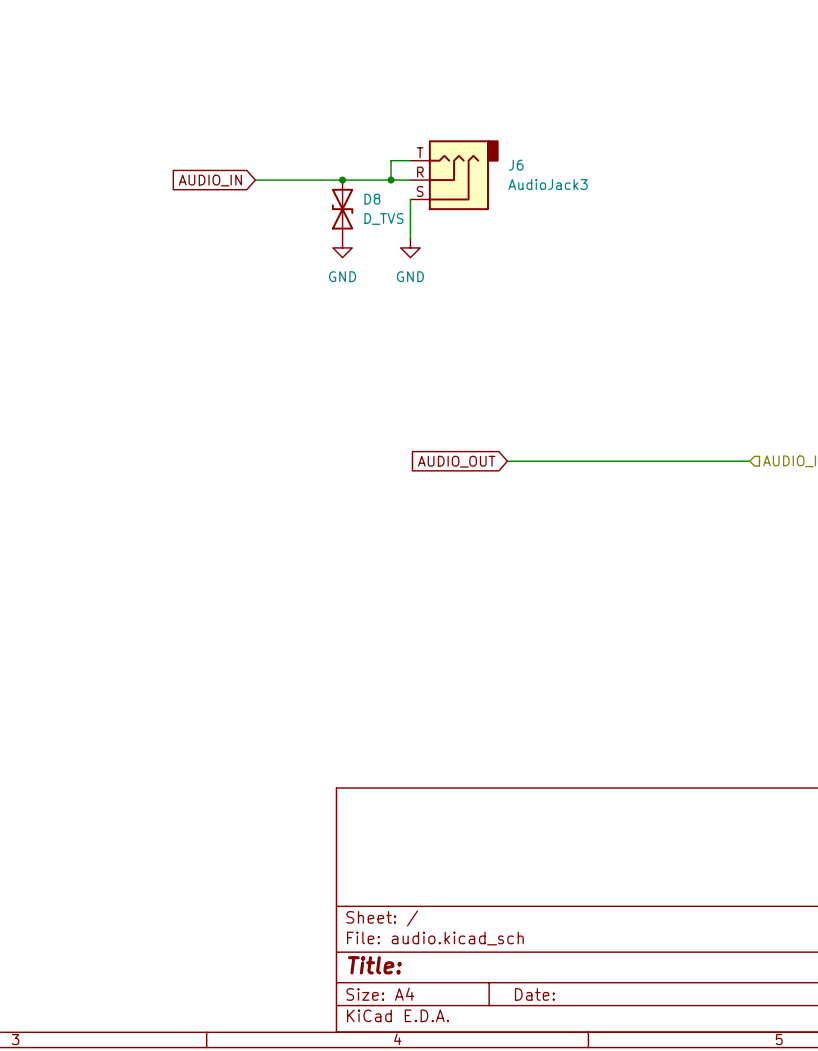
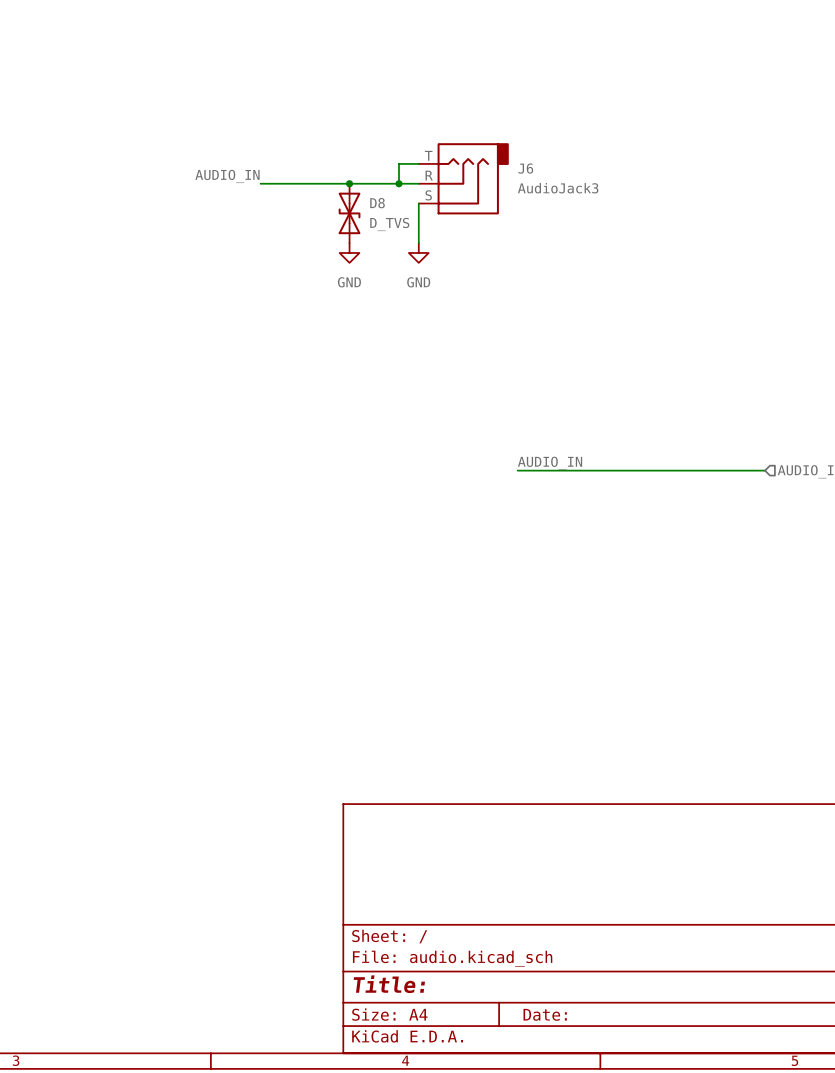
label: none -> AUDIO_IN (227, 176)
global label: AUDIO_IN (210, 180) -> none
label: none -> AUDIO_IN (550, 463)
global label: AUDIO_OUT (456, 461) -> none

